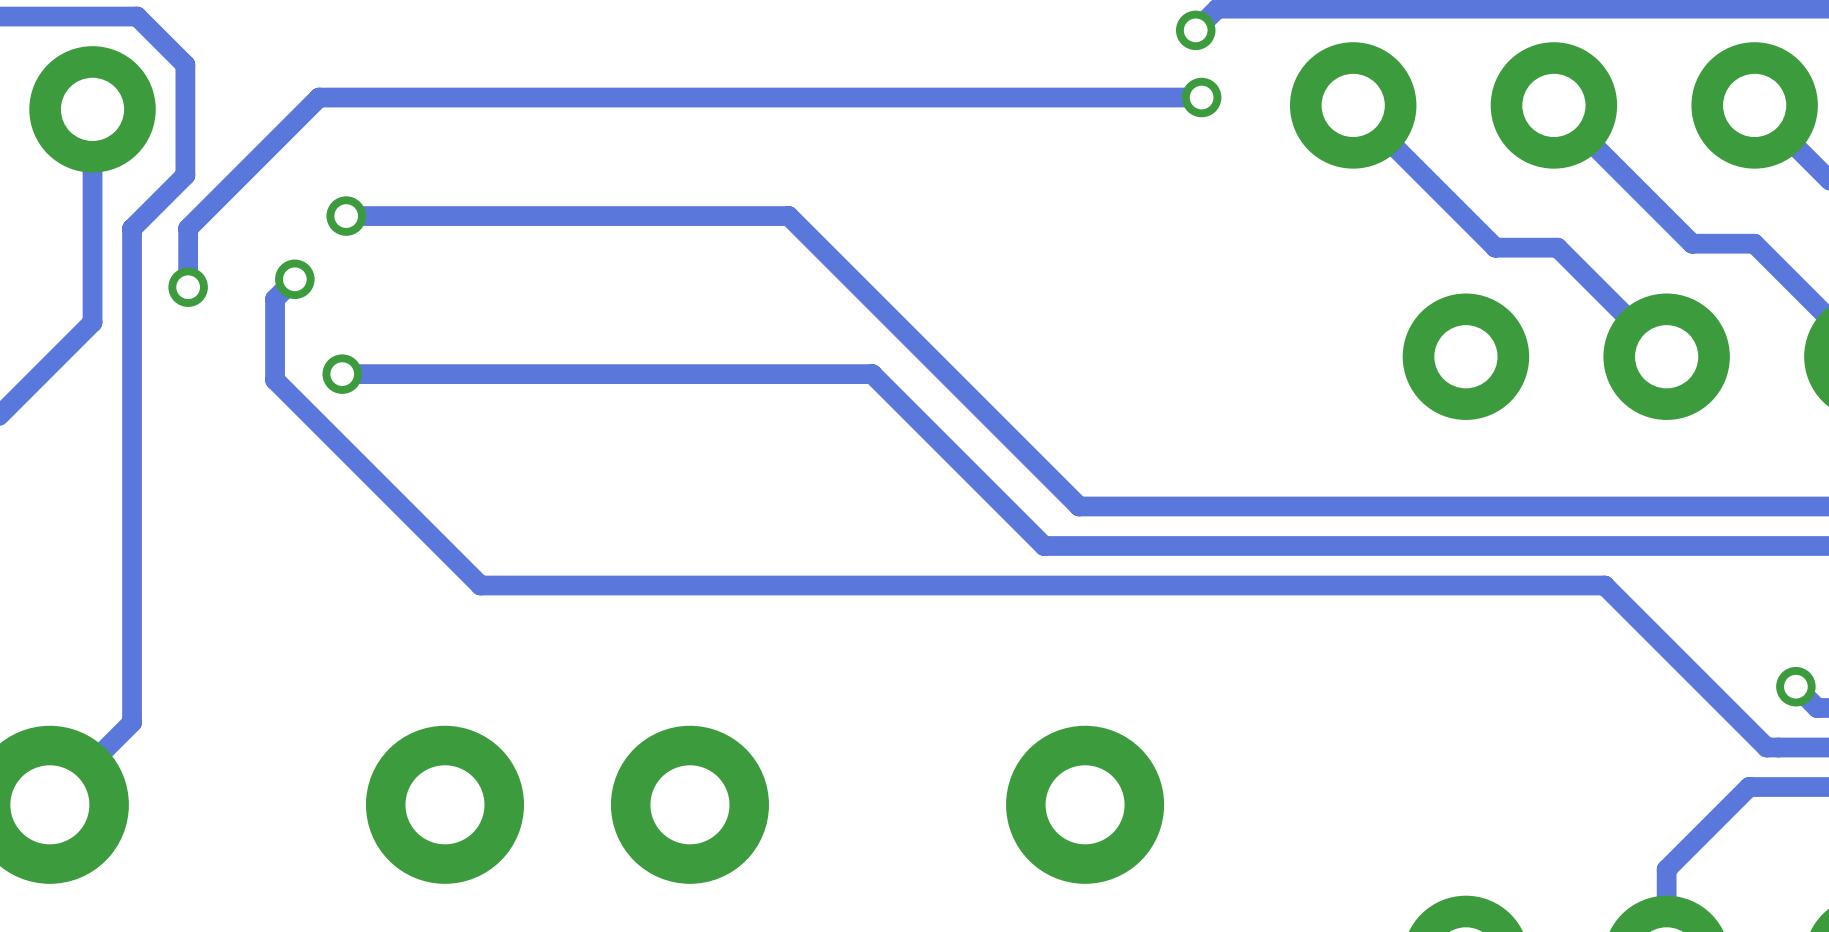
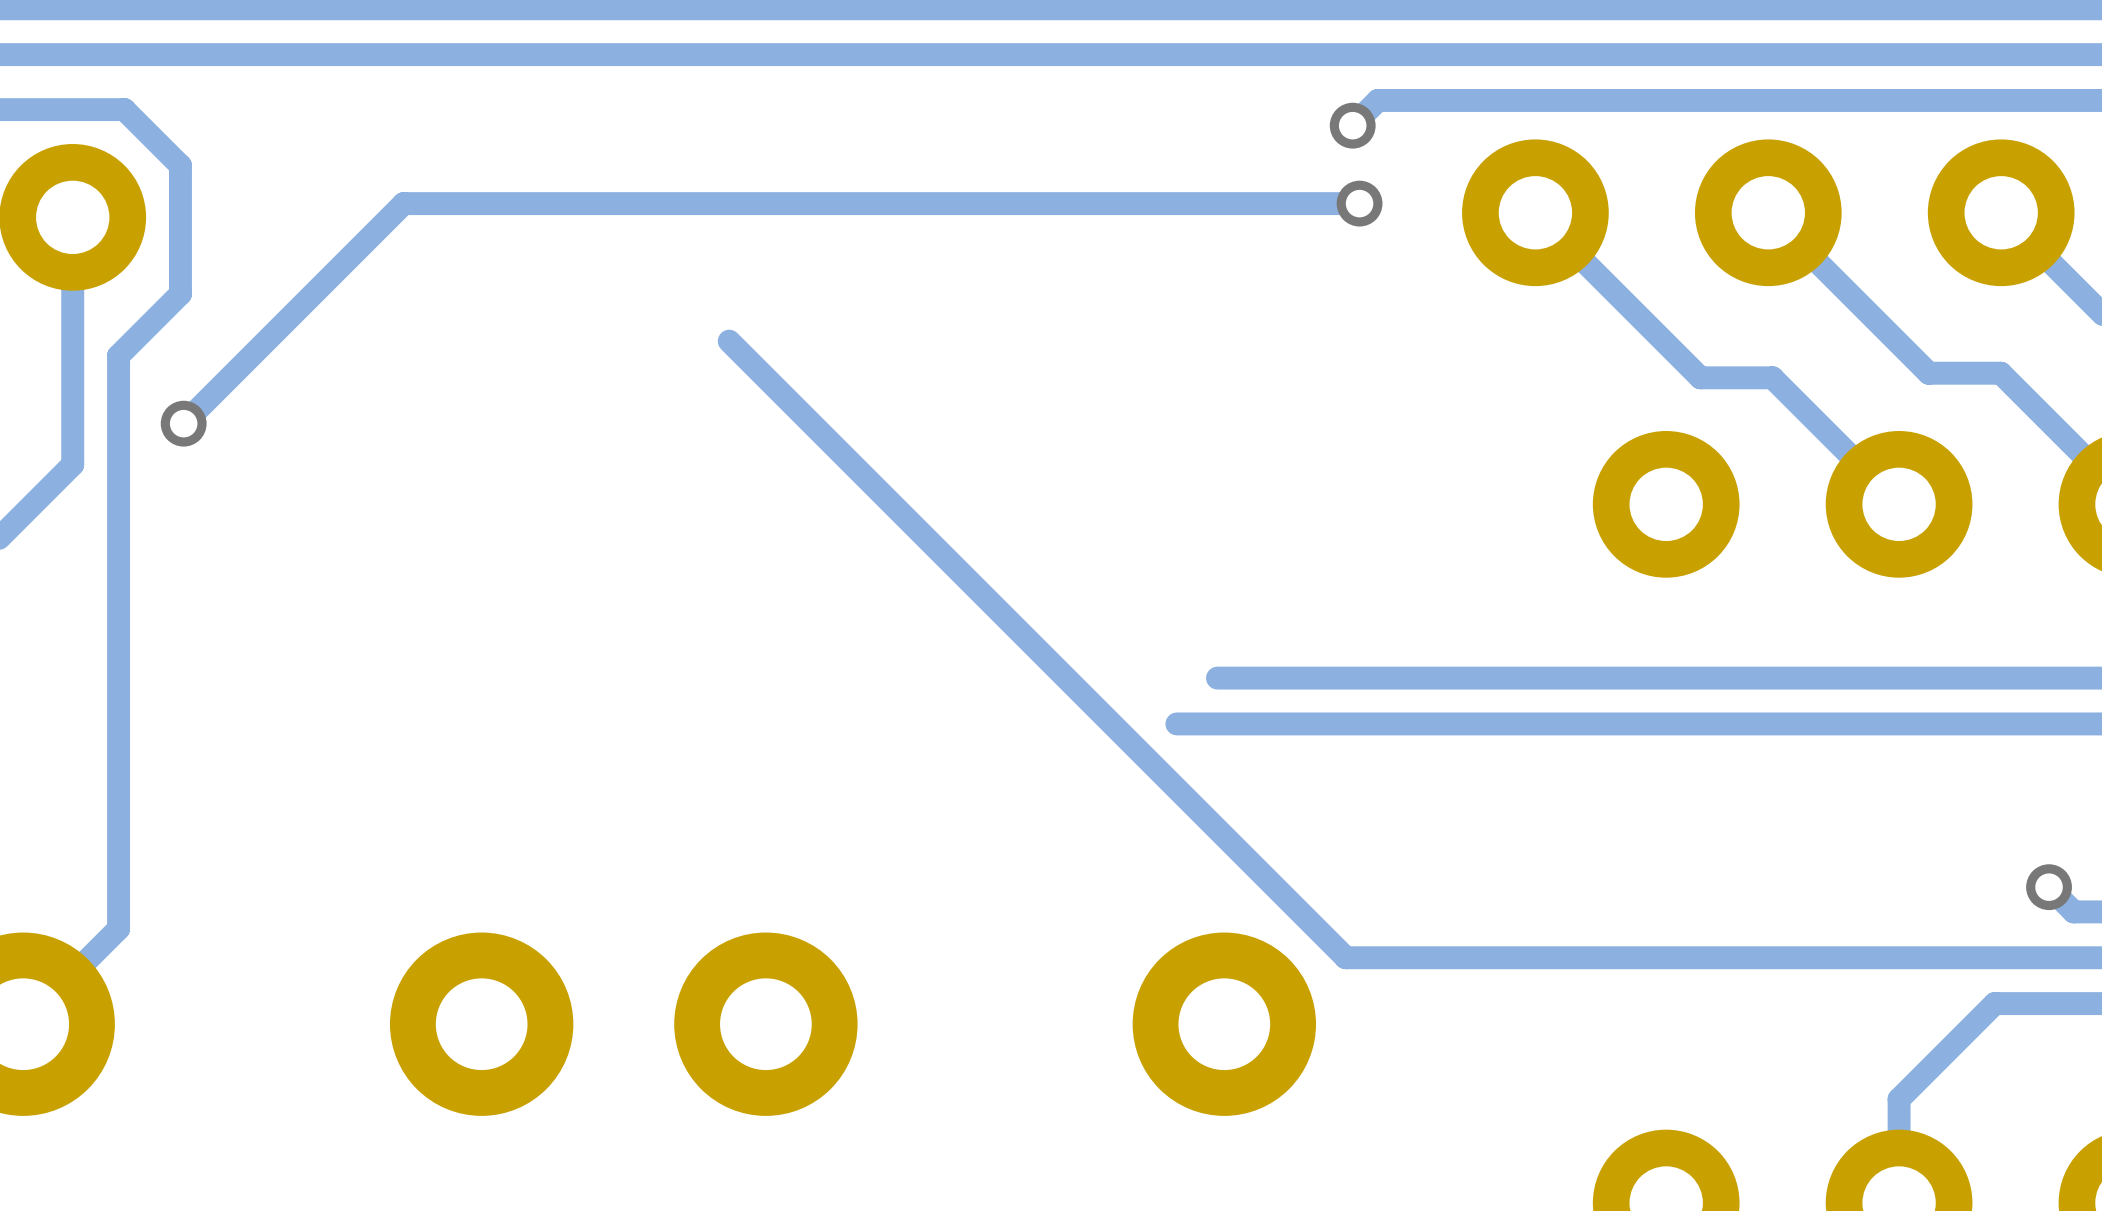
track: (377, 97) (319, 97) (188, 228) (188, 287) -> (403, 203) (183, 423)
track: (346, 216) (788, 216) (1079, 506) -> none
via: (346, 216) -> none
track: (294, 279) (275, 299) (275, 380) (480, 585) (1604, 585) (1766, 747) -> (729, 341) (1345, 957) (2015, 957)
via: (294, 279) -> none
track: (342, 374) (872, 374) (1044, 546) -> none
via: (342, 374) -> none

